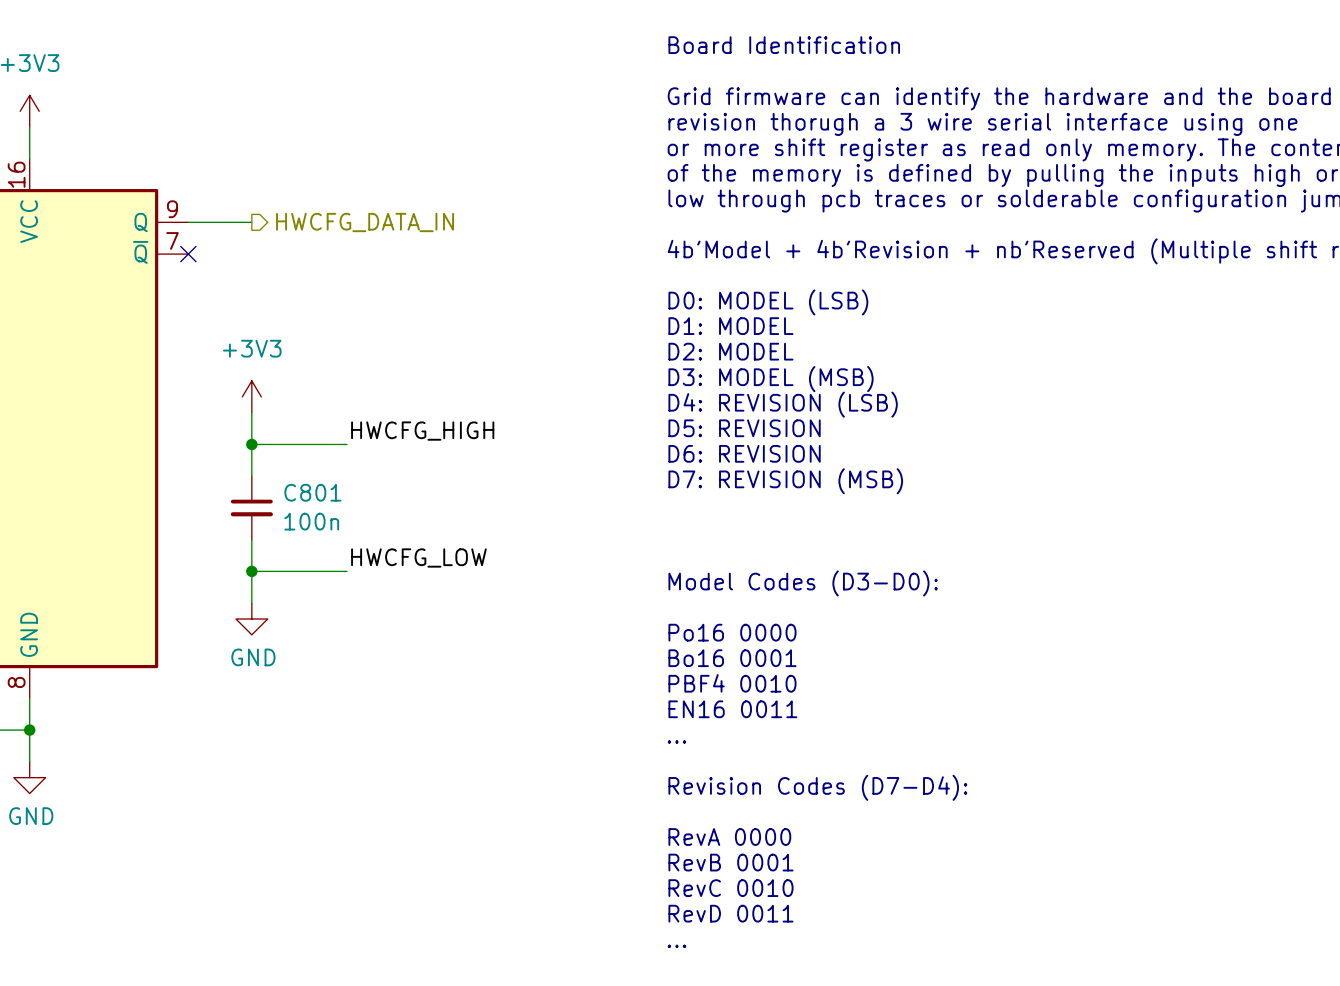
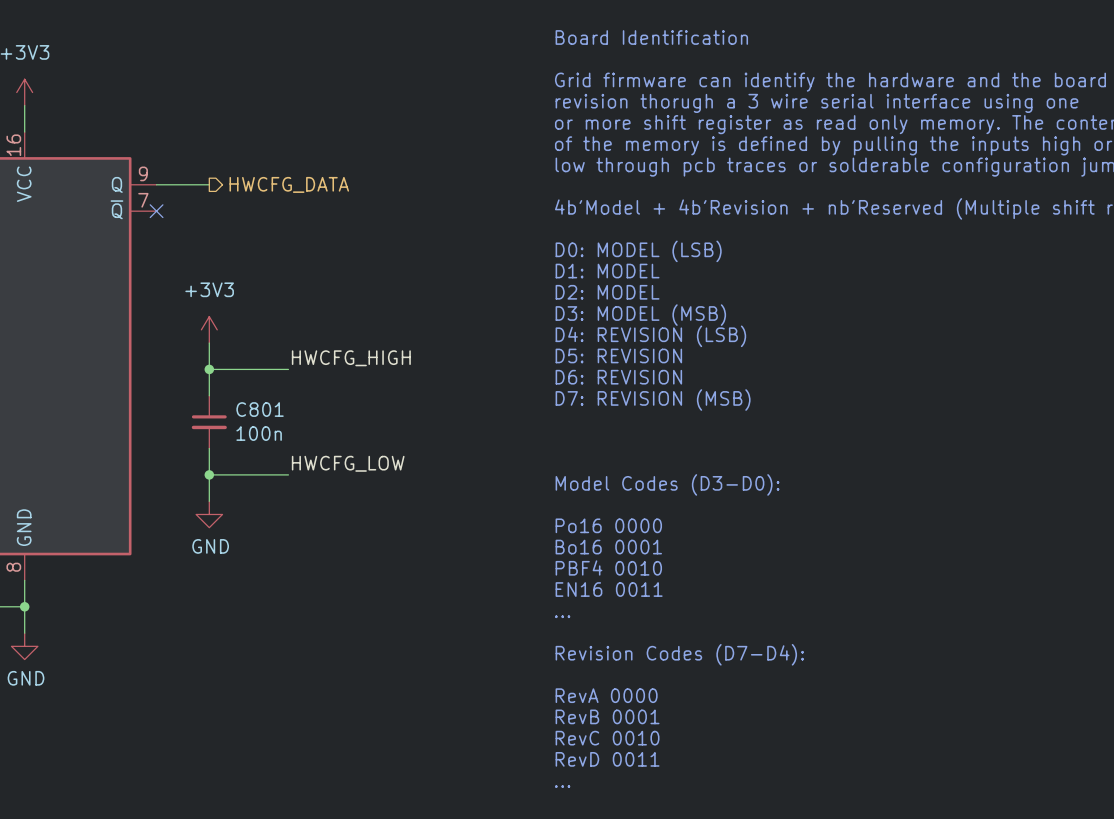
hierarchical label: HWCFG_DATA_IN (365, 222) -> HWCFG_DATA (289, 184)

